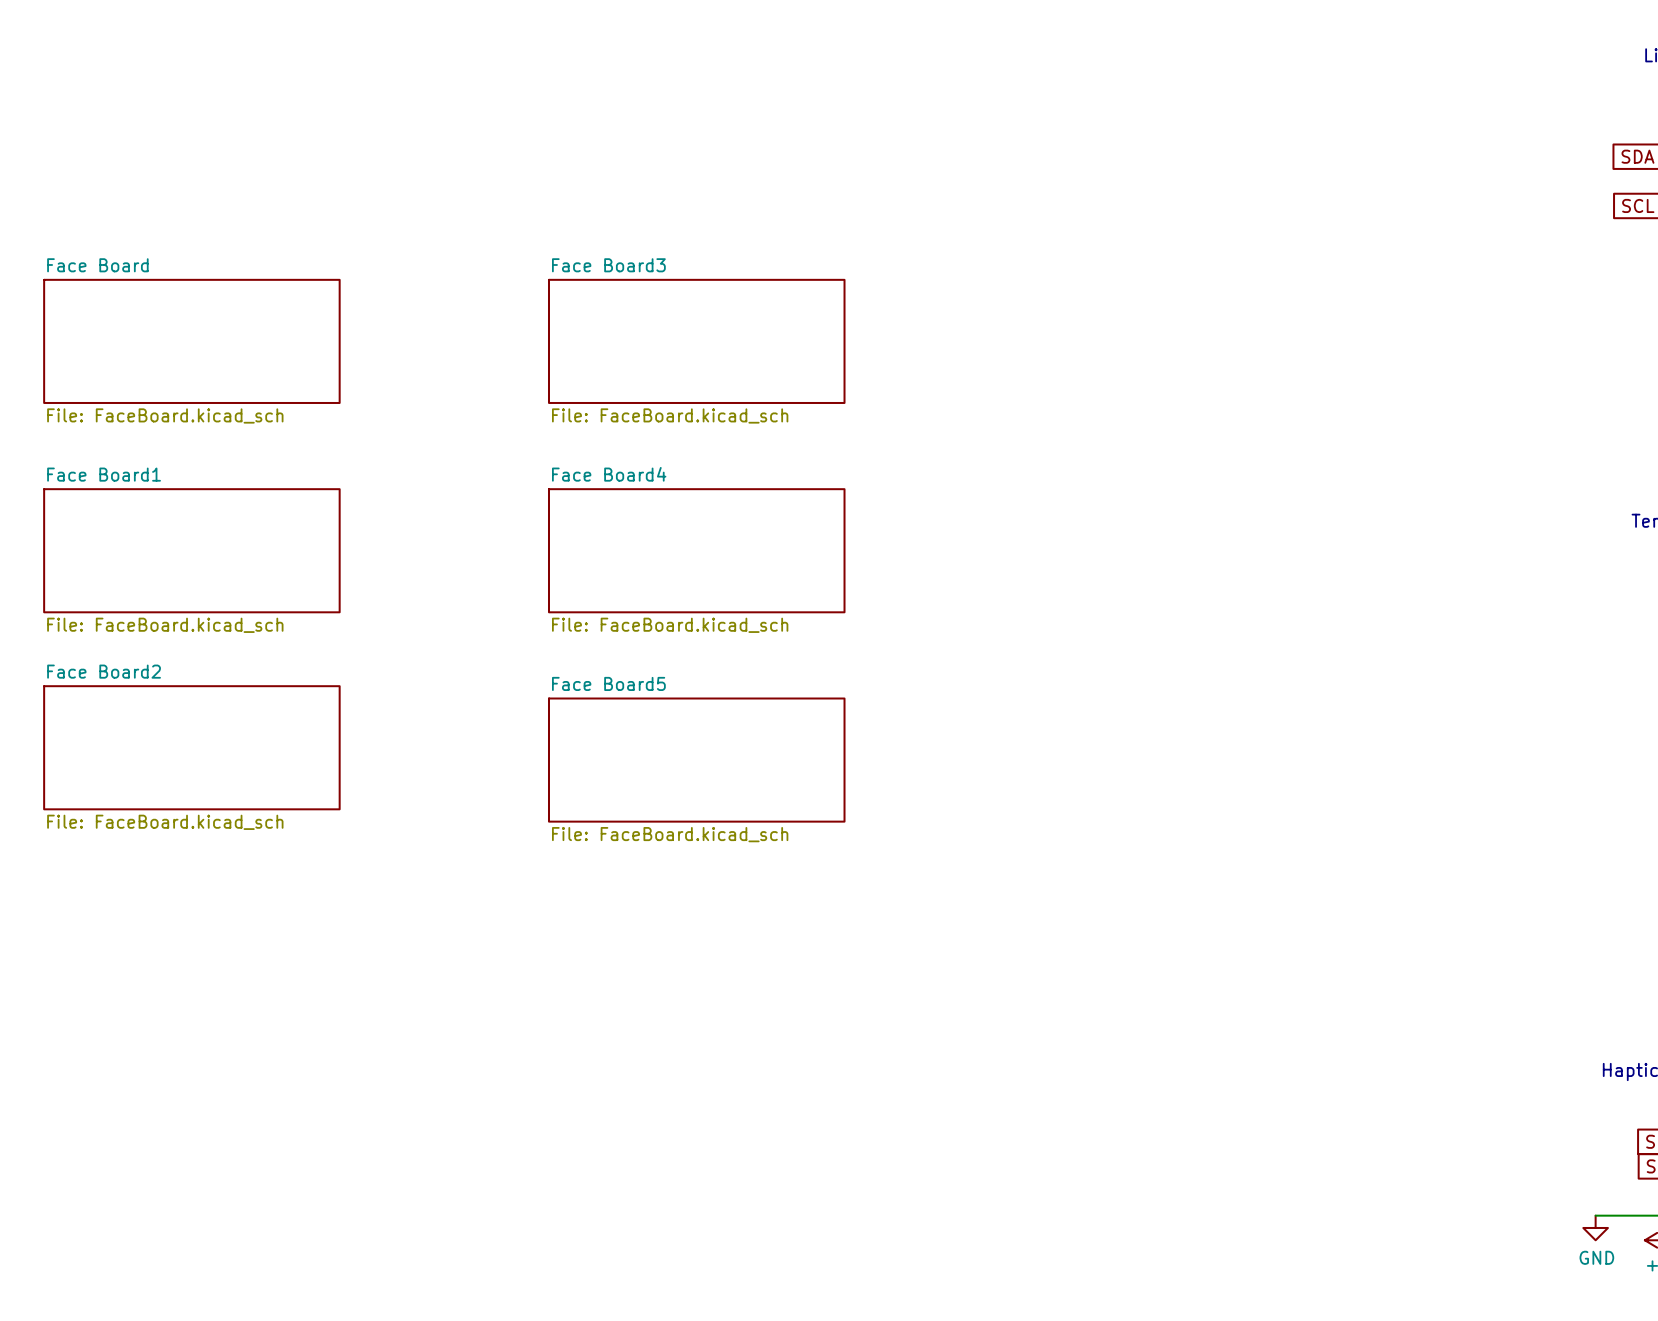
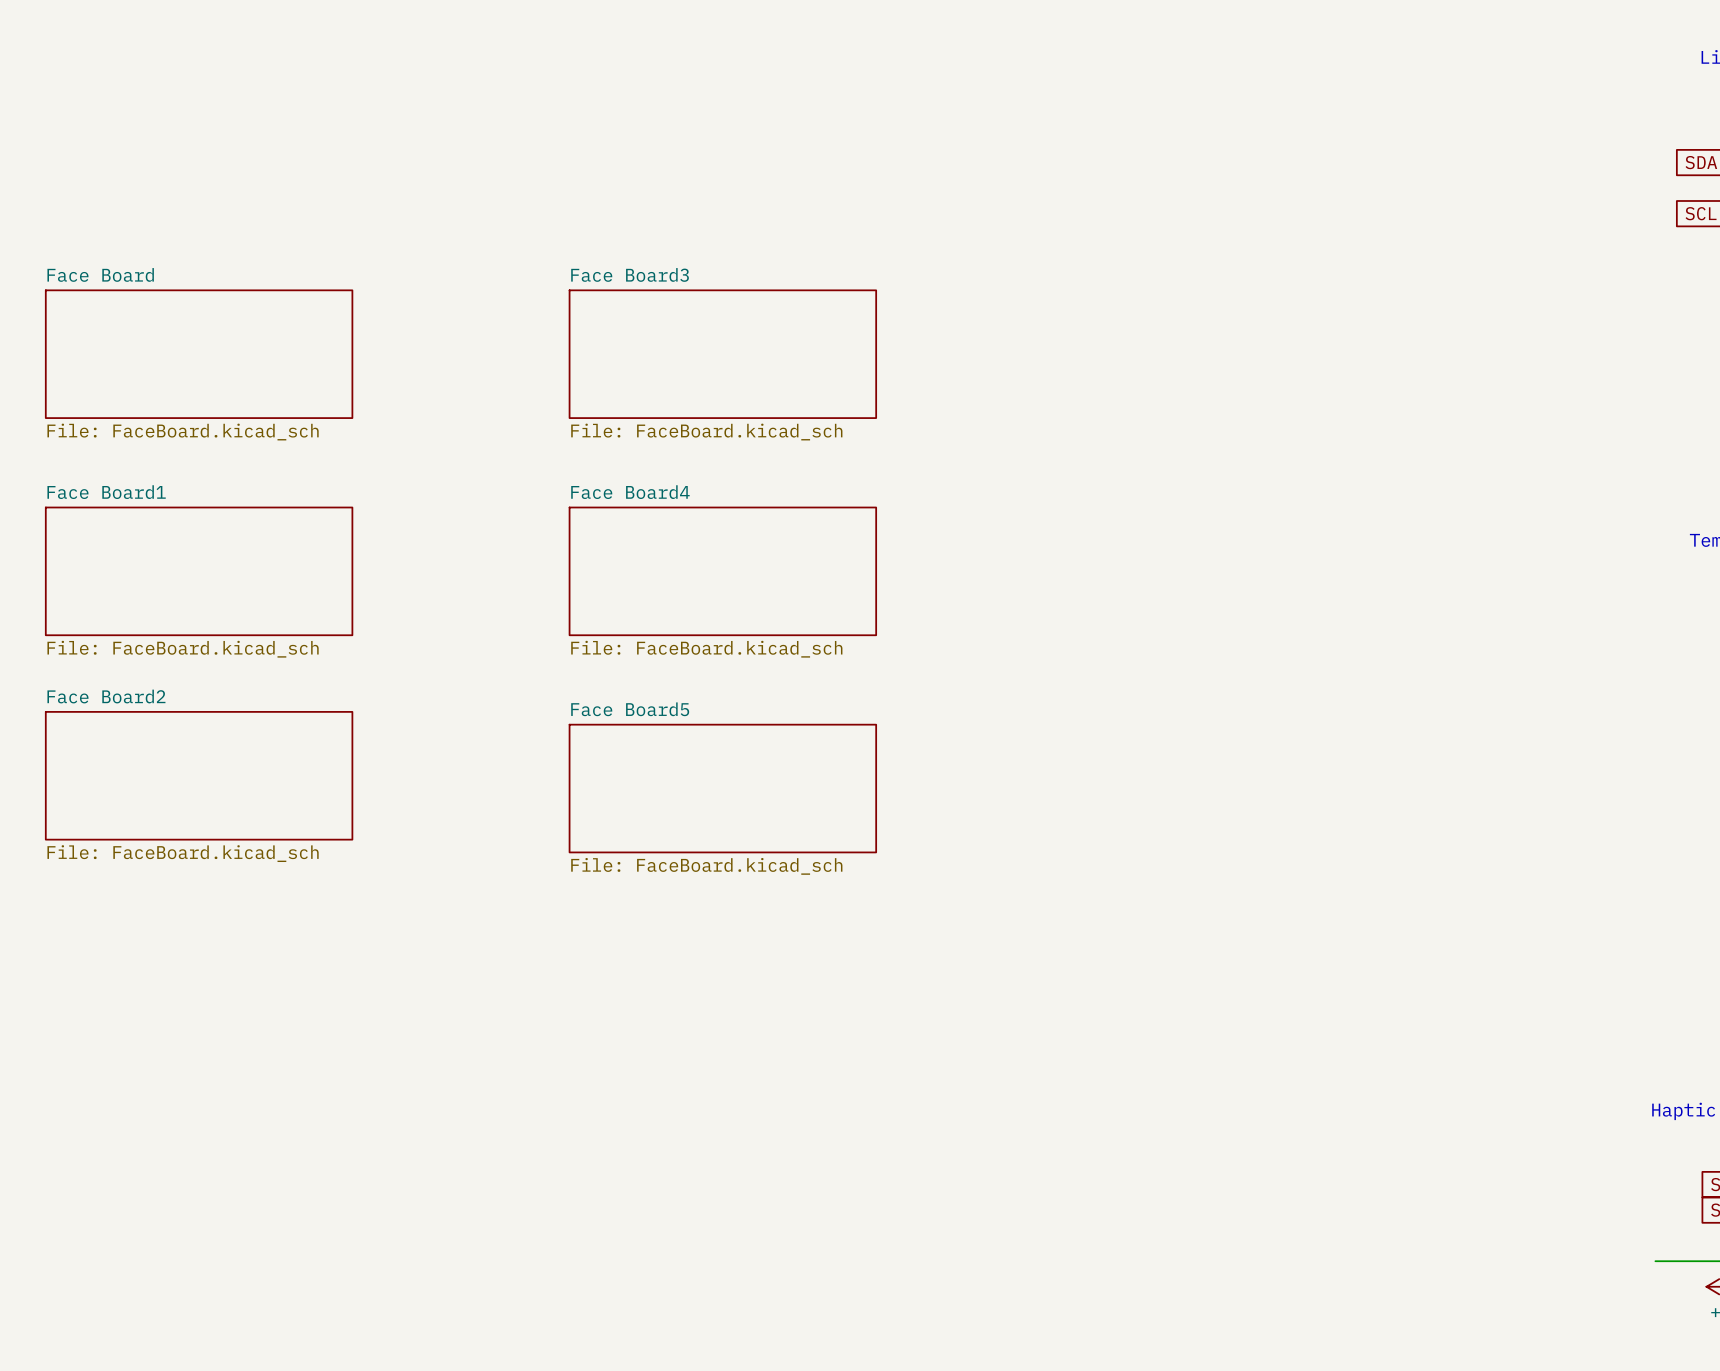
power symbol: GND (1595, 1227) -> none

